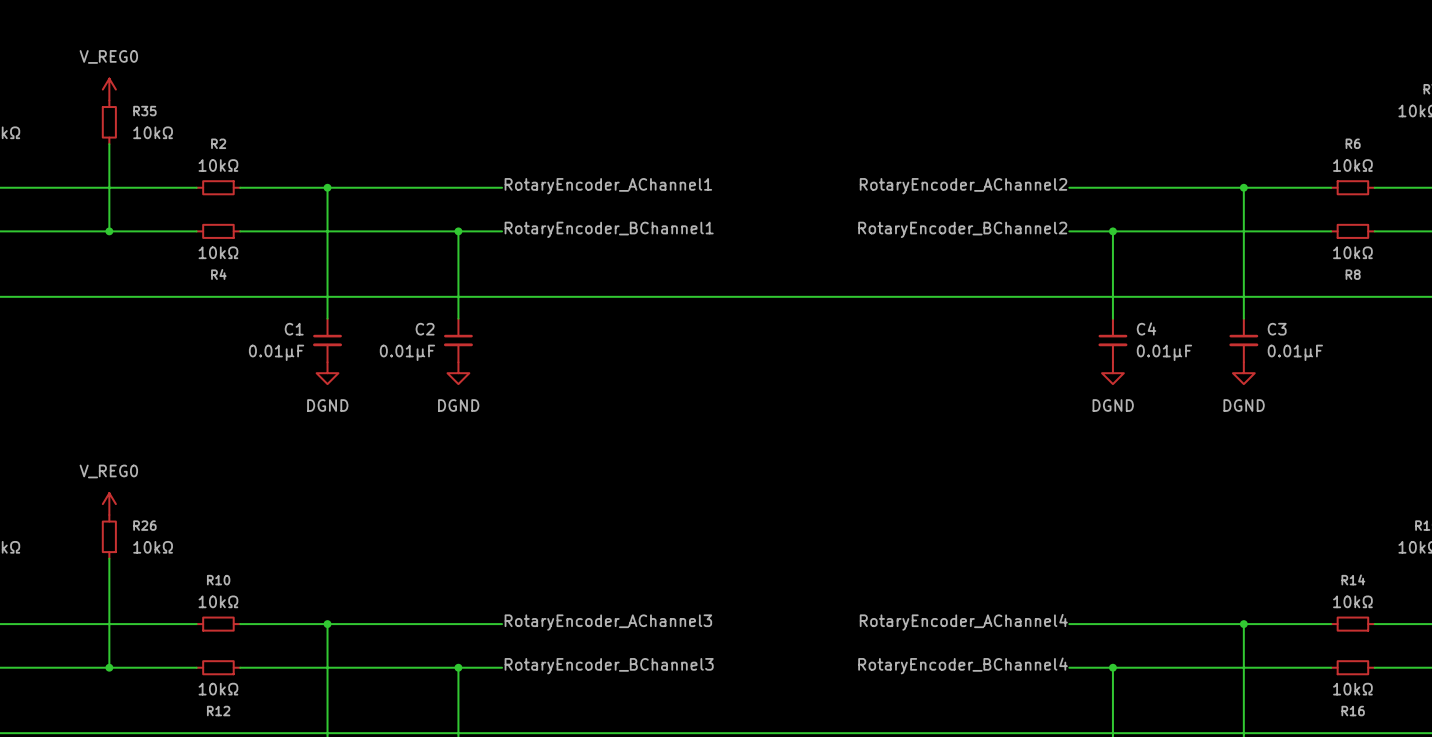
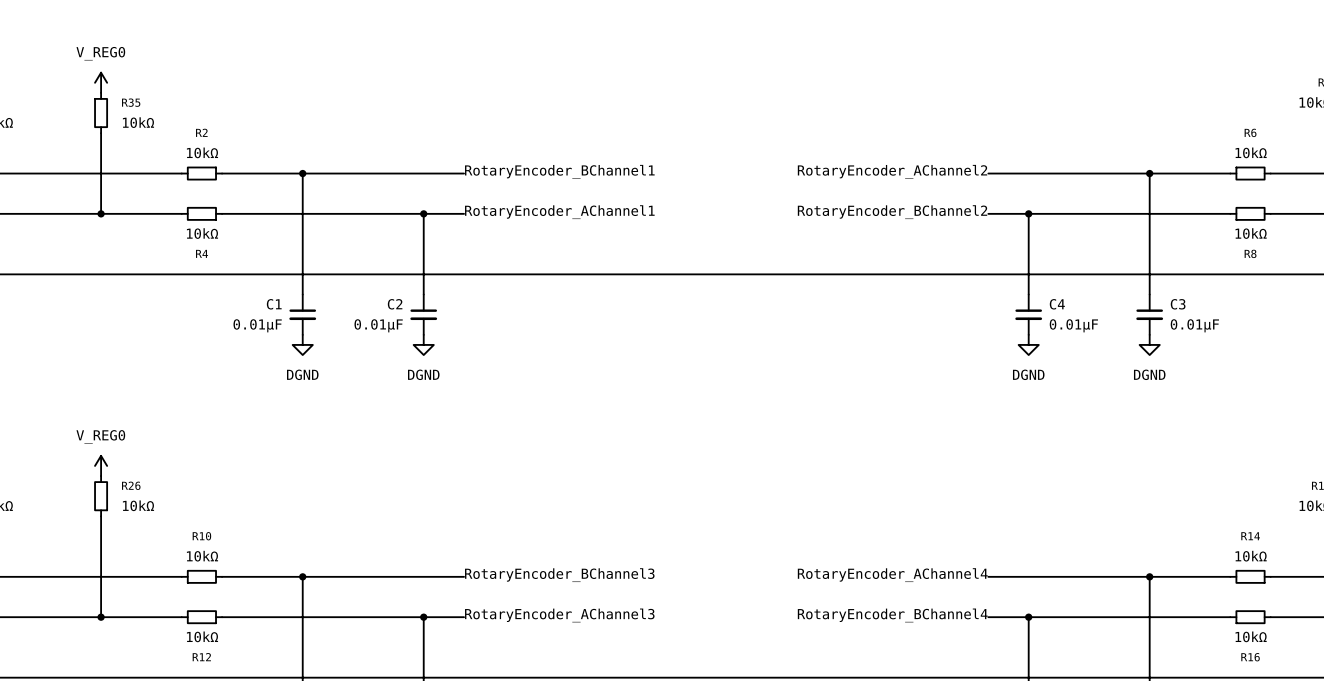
label: RotaryEncoder_AChannel1 (608, 186) -> RotaryEncoder_BChannel1 (559, 171)
label: RotaryEncoder_BChannel1 (609, 229) -> RotaryEncoder_AChannel1 (559, 212)
label: RotaryEncoder_AChannel3 (608, 622) -> RotaryEncoder_BChannel3 (559, 575)
label: RotaryEncoder_BChannel3 (609, 666) -> RotaryEncoder_AChannel3 (559, 615)

